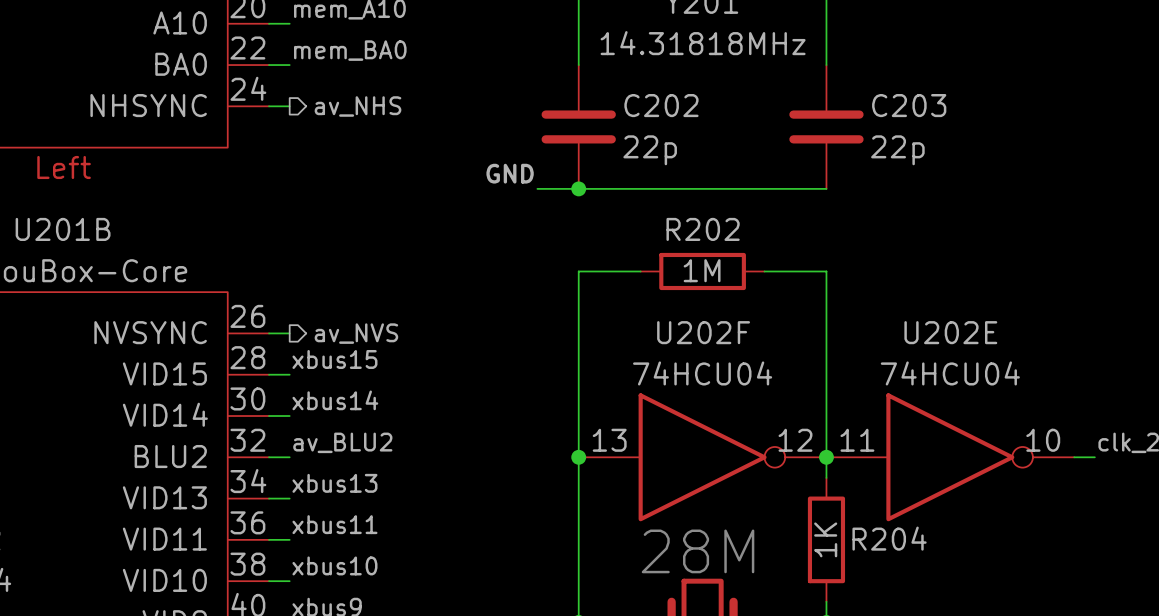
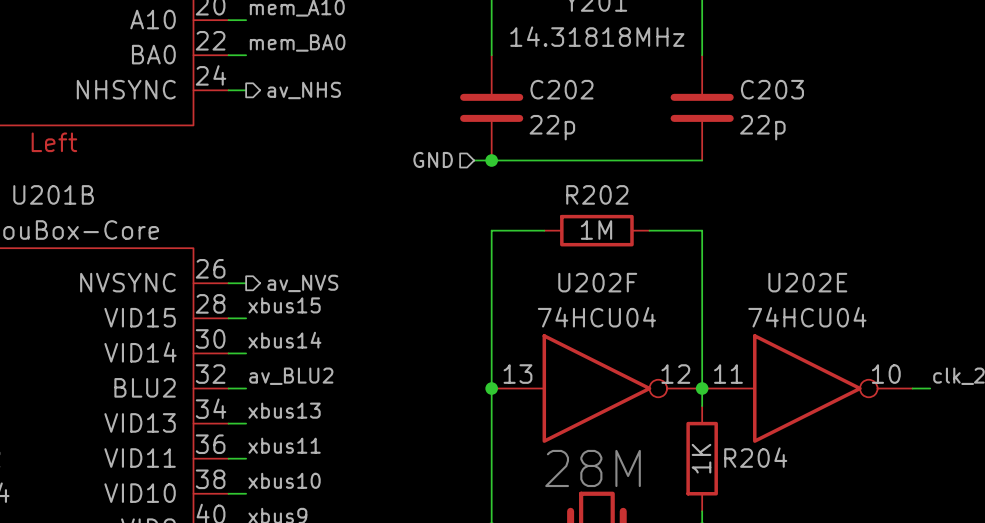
label: GND (510, 173) -> none
hierarchical label: none -> GND (433, 159)
wire: (537, 188) (558, 188) -> none

